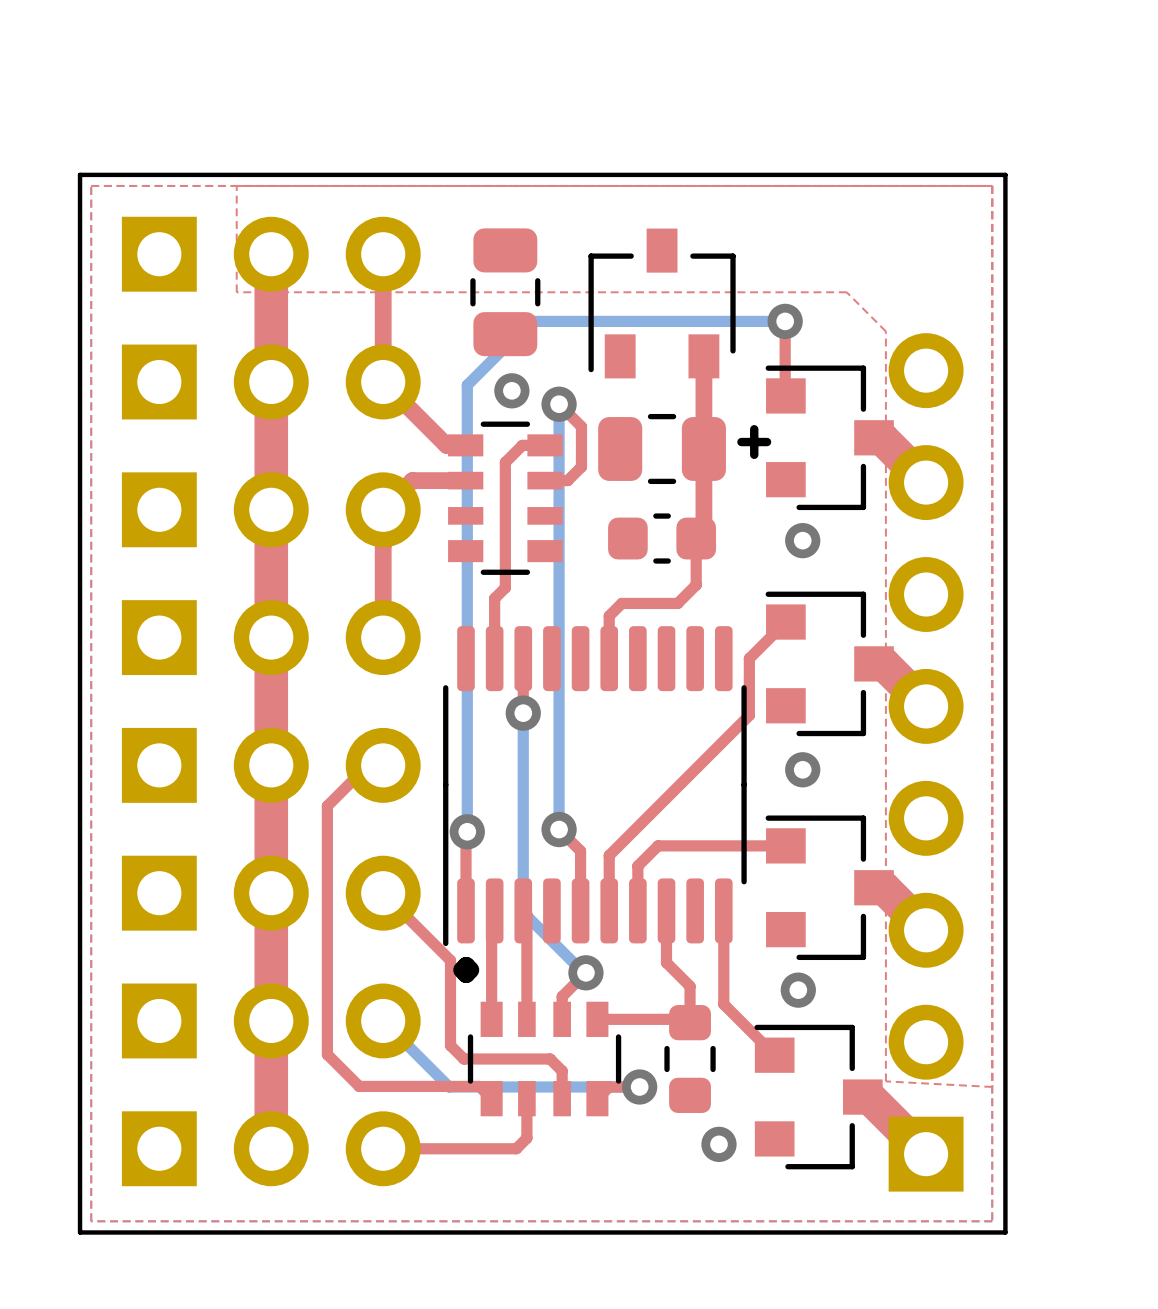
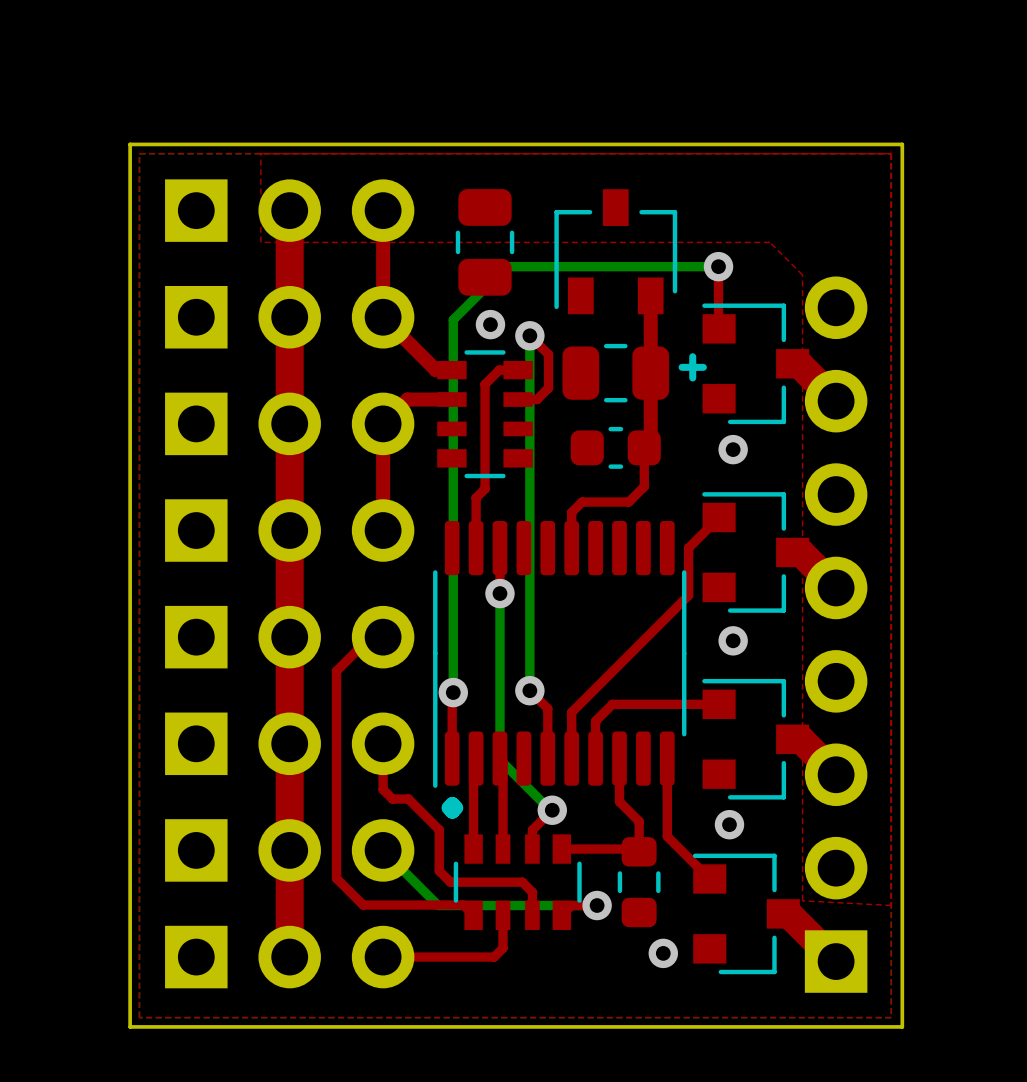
top track: (383, 893) (450, 960) (450, 996) -> (383, 743) (383, 789) (392, 799) (408, 799) (439, 829)

